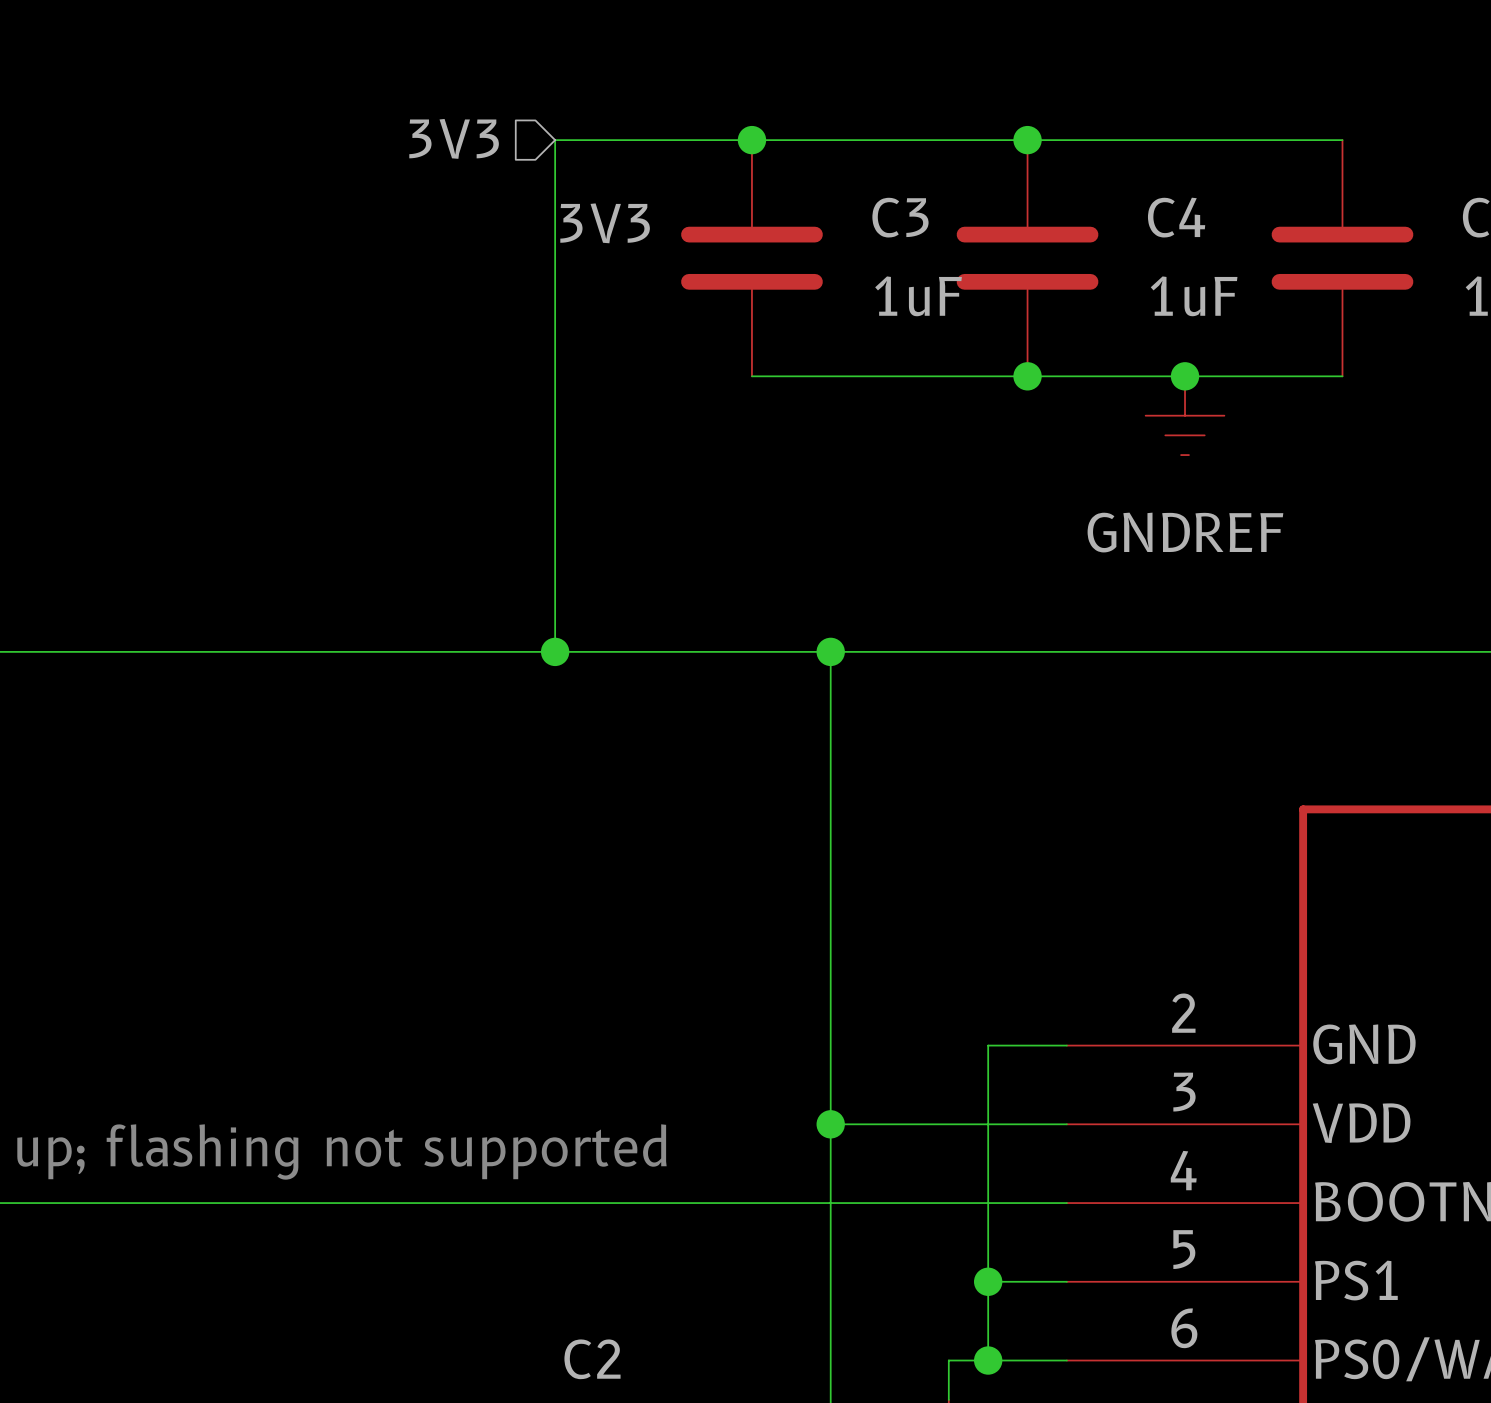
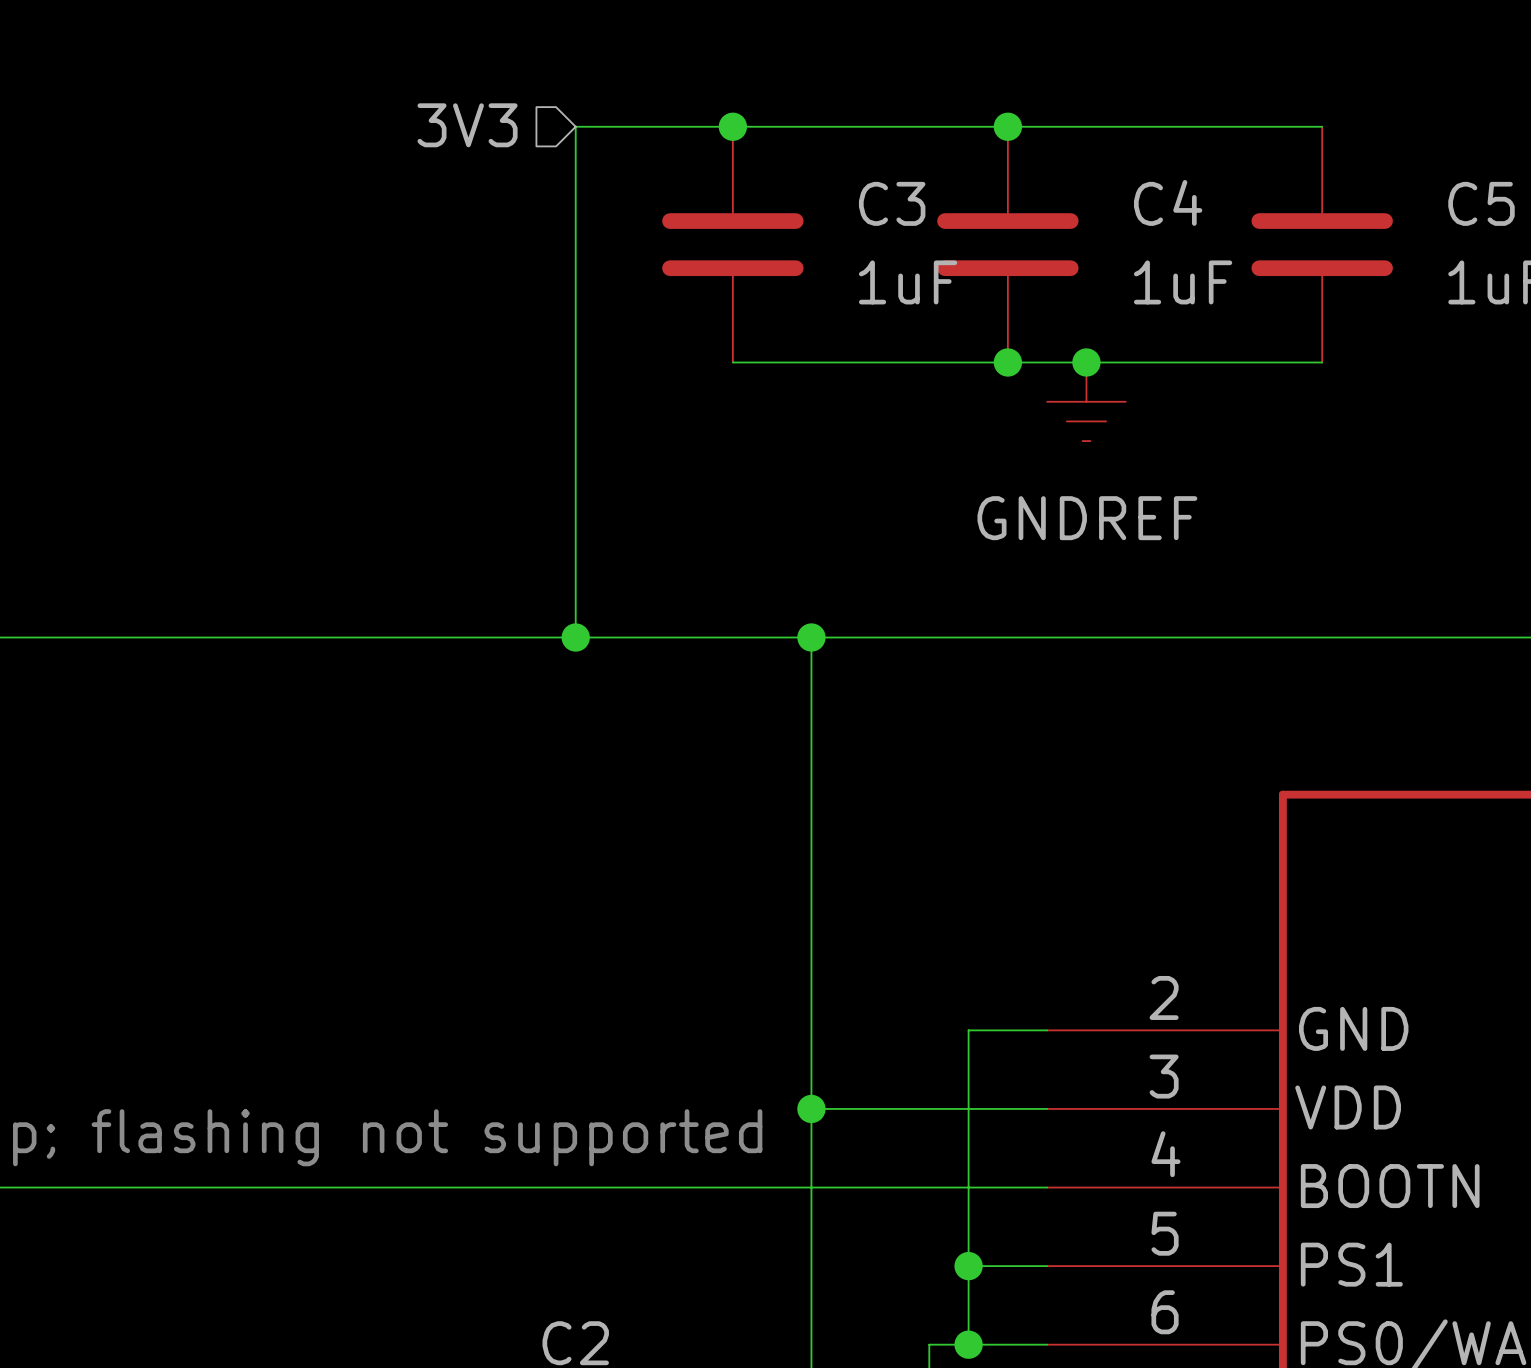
hierarchical label position: 3V3 (454, 138) -> 3V3 (467, 125)
wire: (594, 140) (555, 140) (555, 651) -> (575, 126) (575, 637)
label: 3V3 (605, 223) -> none
junction position: (1185, 376) -> (1086, 362)
power symbol position: GNDREF (1185, 415) -> GNDREF (1086, 401)
junction position: (555, 651) -> (575, 637)

